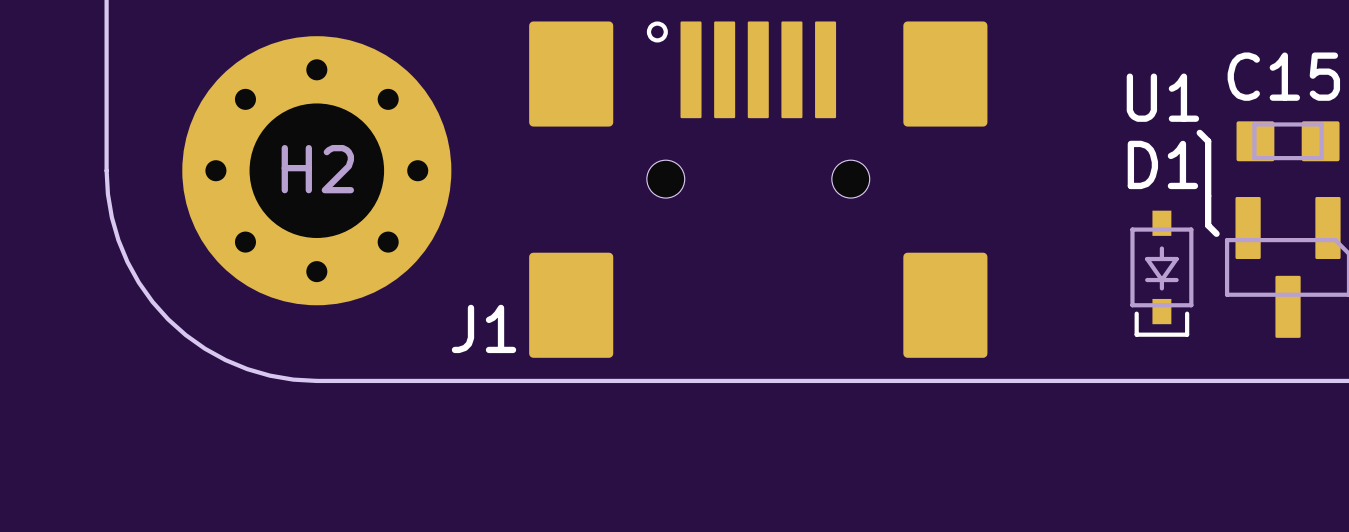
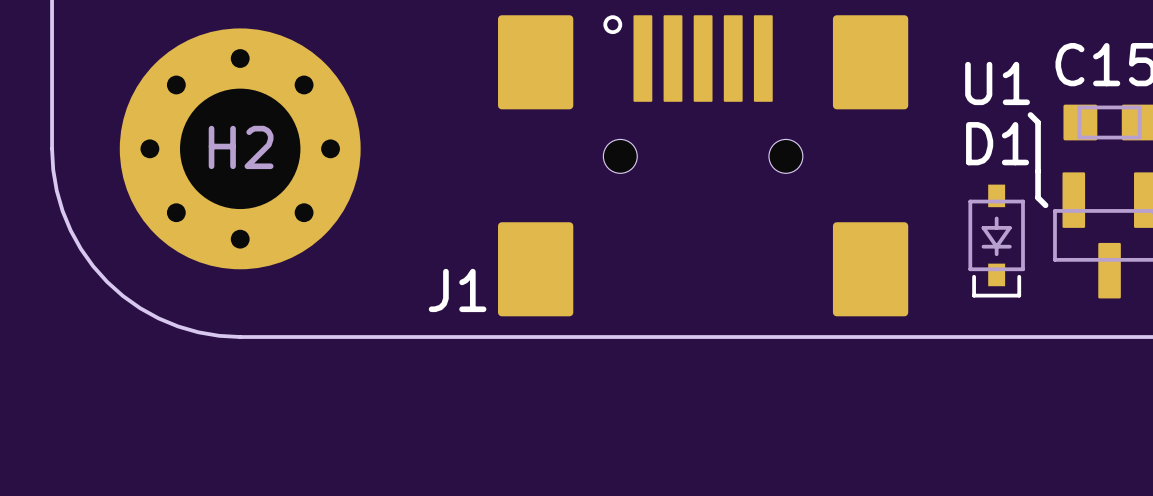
J1 position: (758, 189) -> (703, 165)

